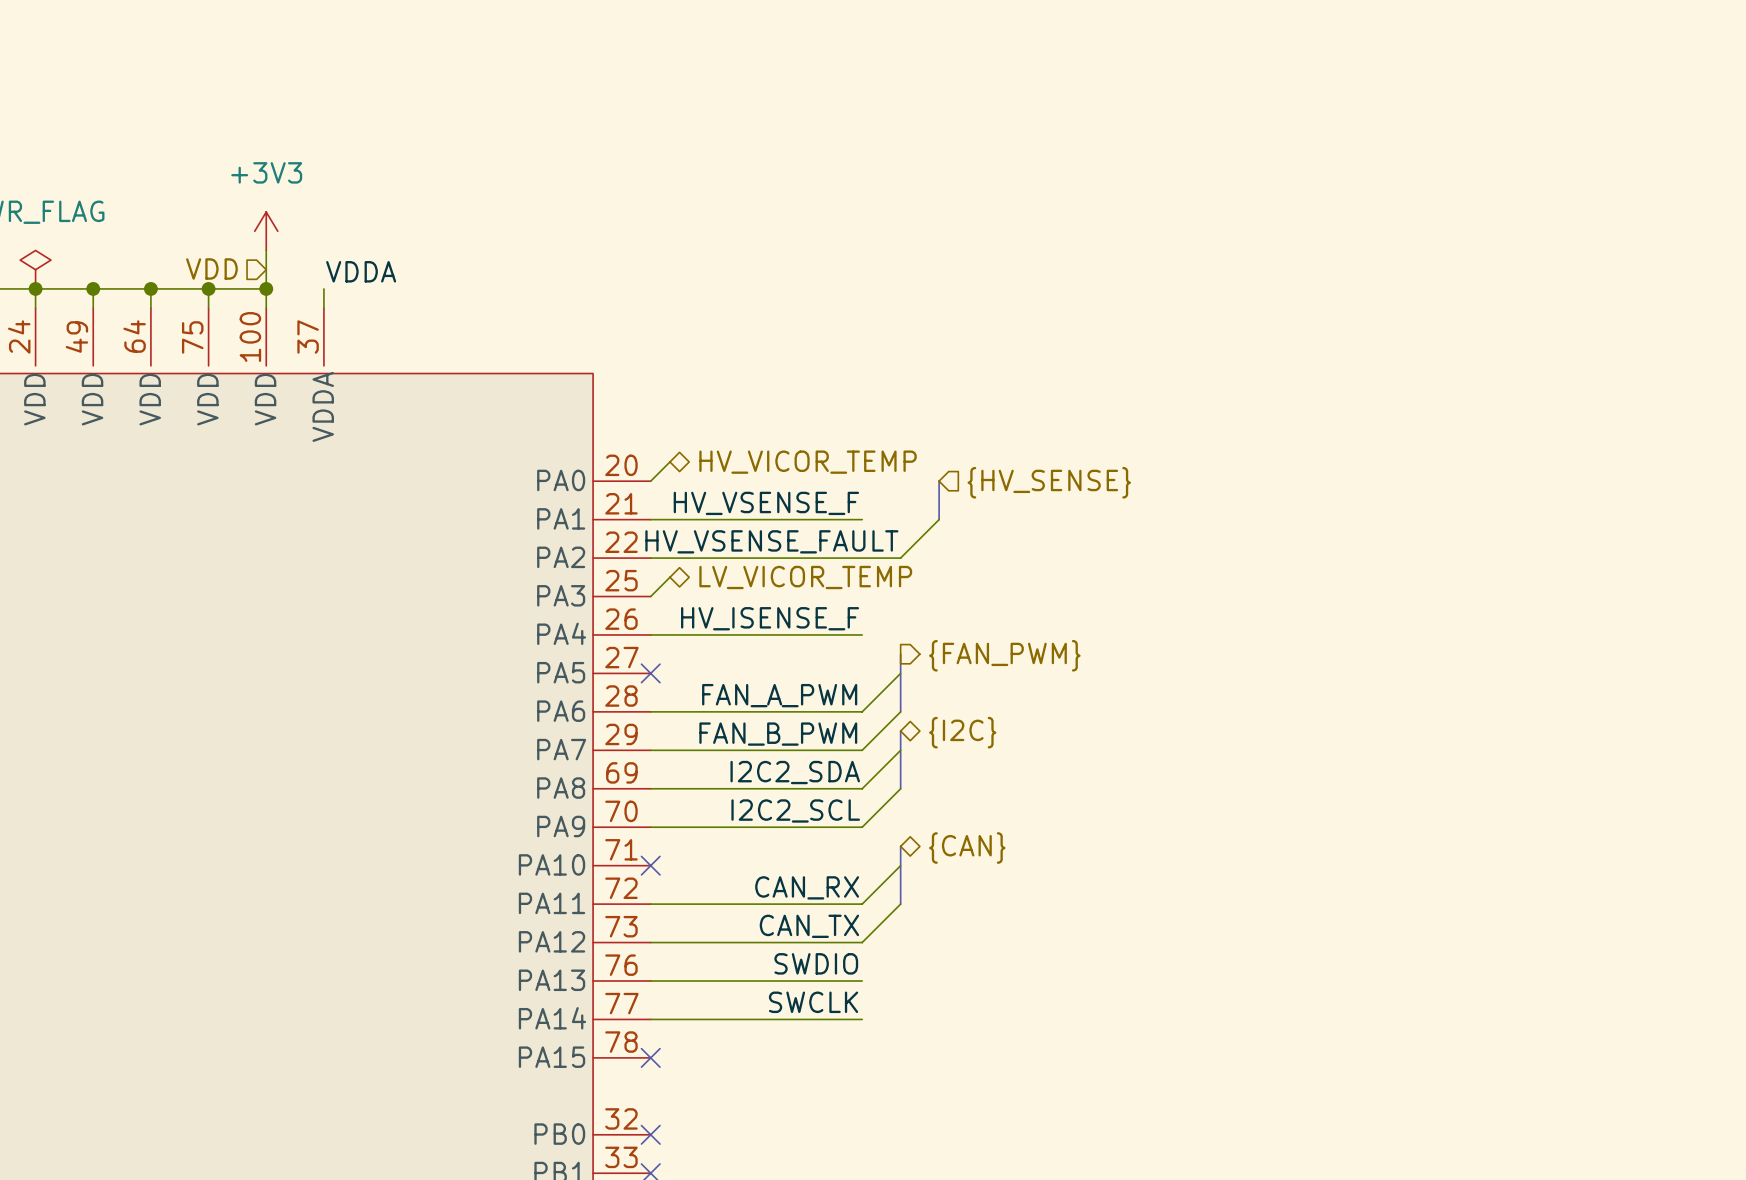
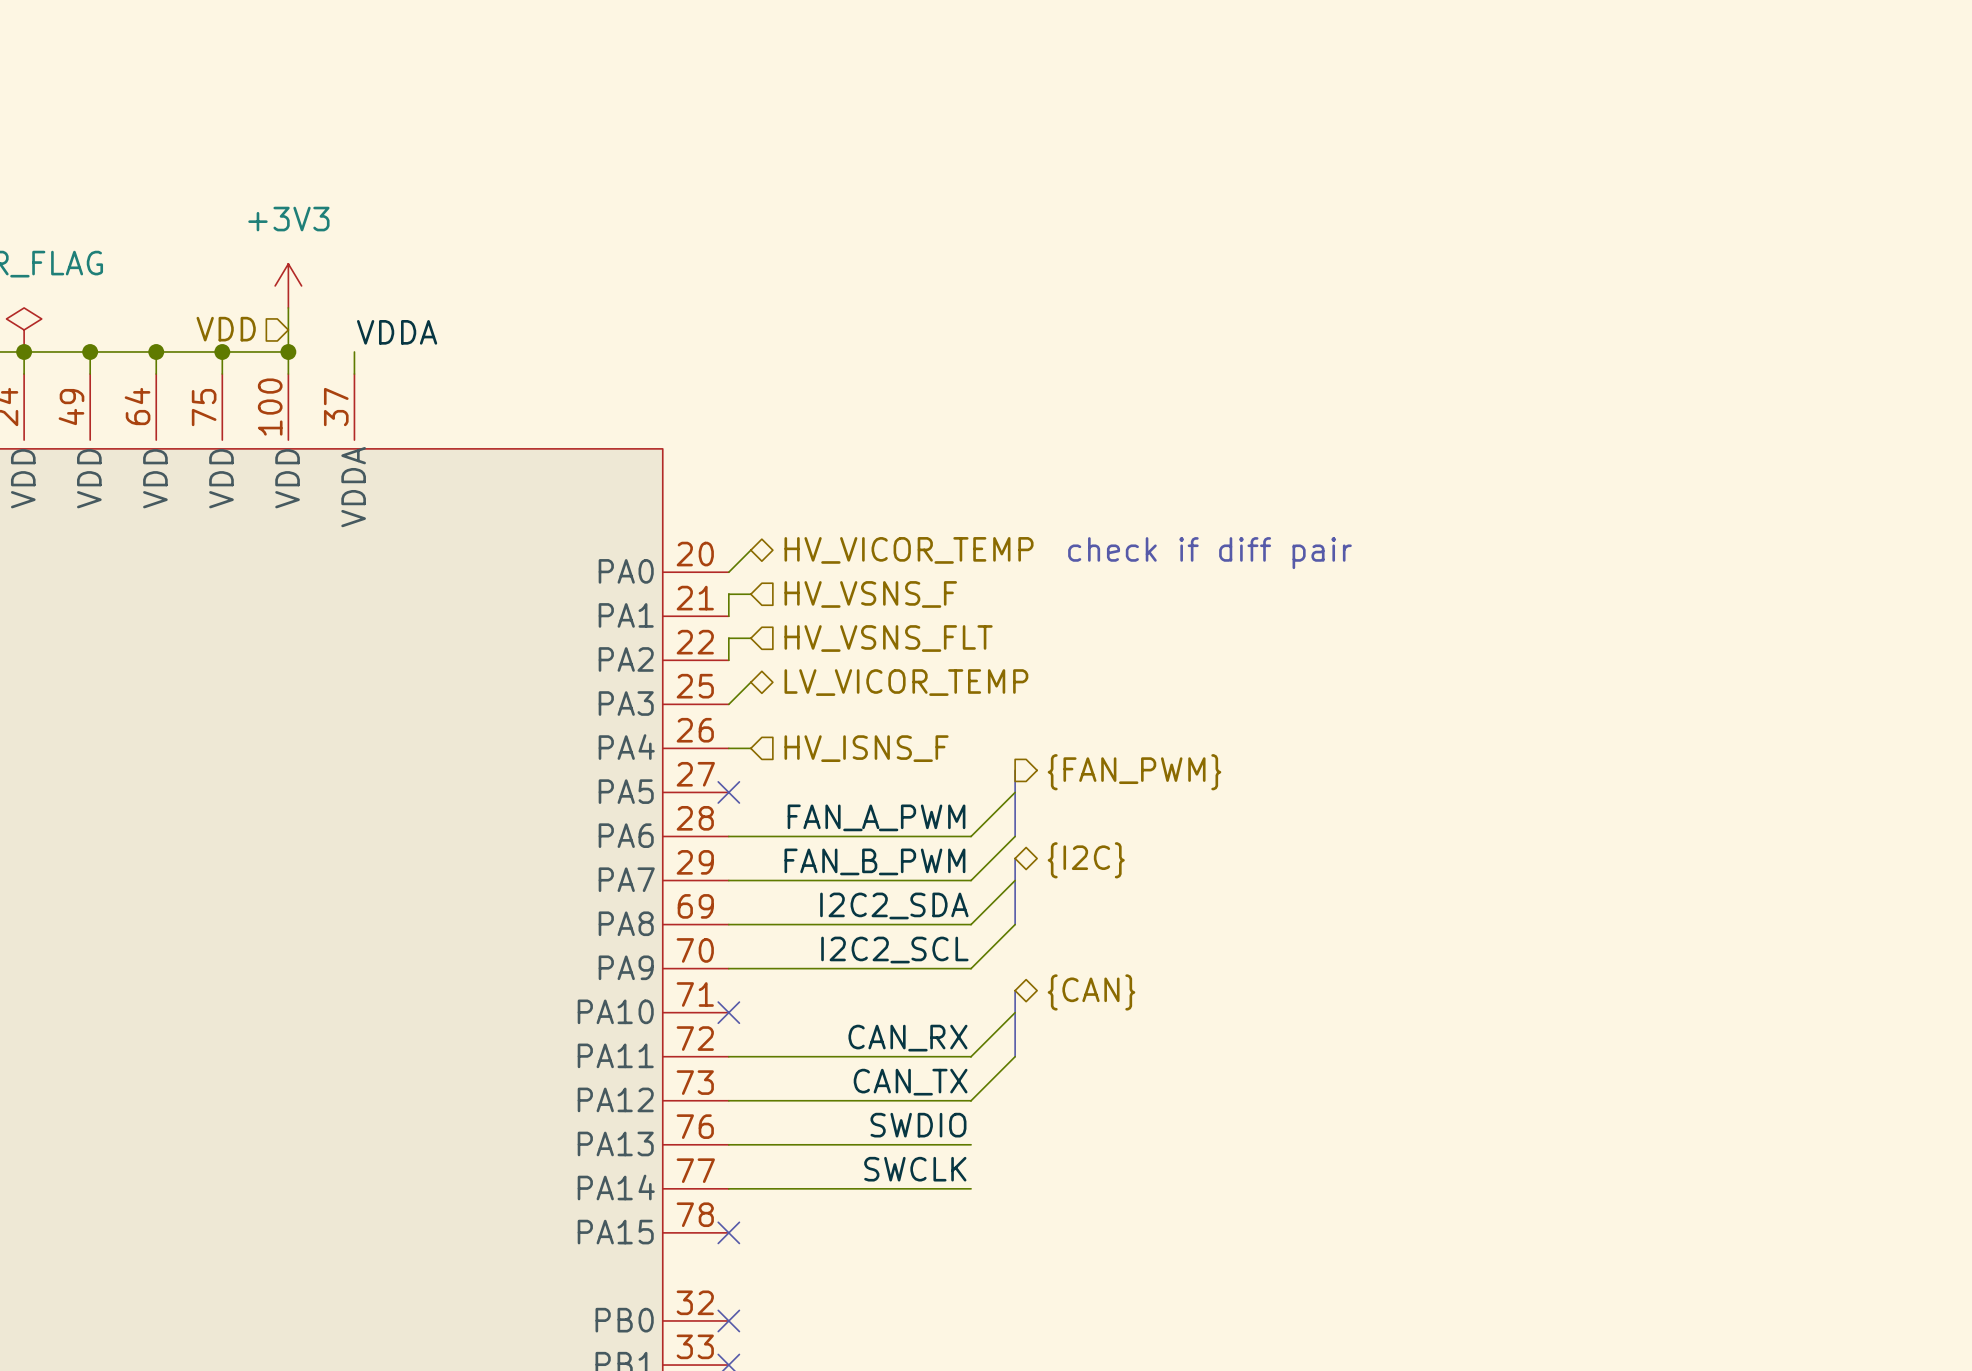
text: none -> check if diff pair (1209, 553)
bus: (939, 481) (939, 519) -> none
hierarchical label: {HV_SENSE} (1049, 482) -> none
hierarchical label: none -> HV_VSNS_F (870, 594)
label: HV_VSENSE_F (766, 503) -> none
wire: (650, 519) (862, 519) -> (728, 616) (728, 594) (750, 594)
wire: (939, 519) (900, 558) (650, 558) -> (750, 638) (728, 638) (728, 660)
hierarchical label: none -> HV_VSNS_FLT (888, 638)
label: HV_VSENSE_FAULT (771, 541) -> none
label: HV_ISENSE_F (770, 618) -> none
wire: (669, 634) (862, 634) -> none
hierarchical label: none -> HV_ISNS_F (866, 748)

